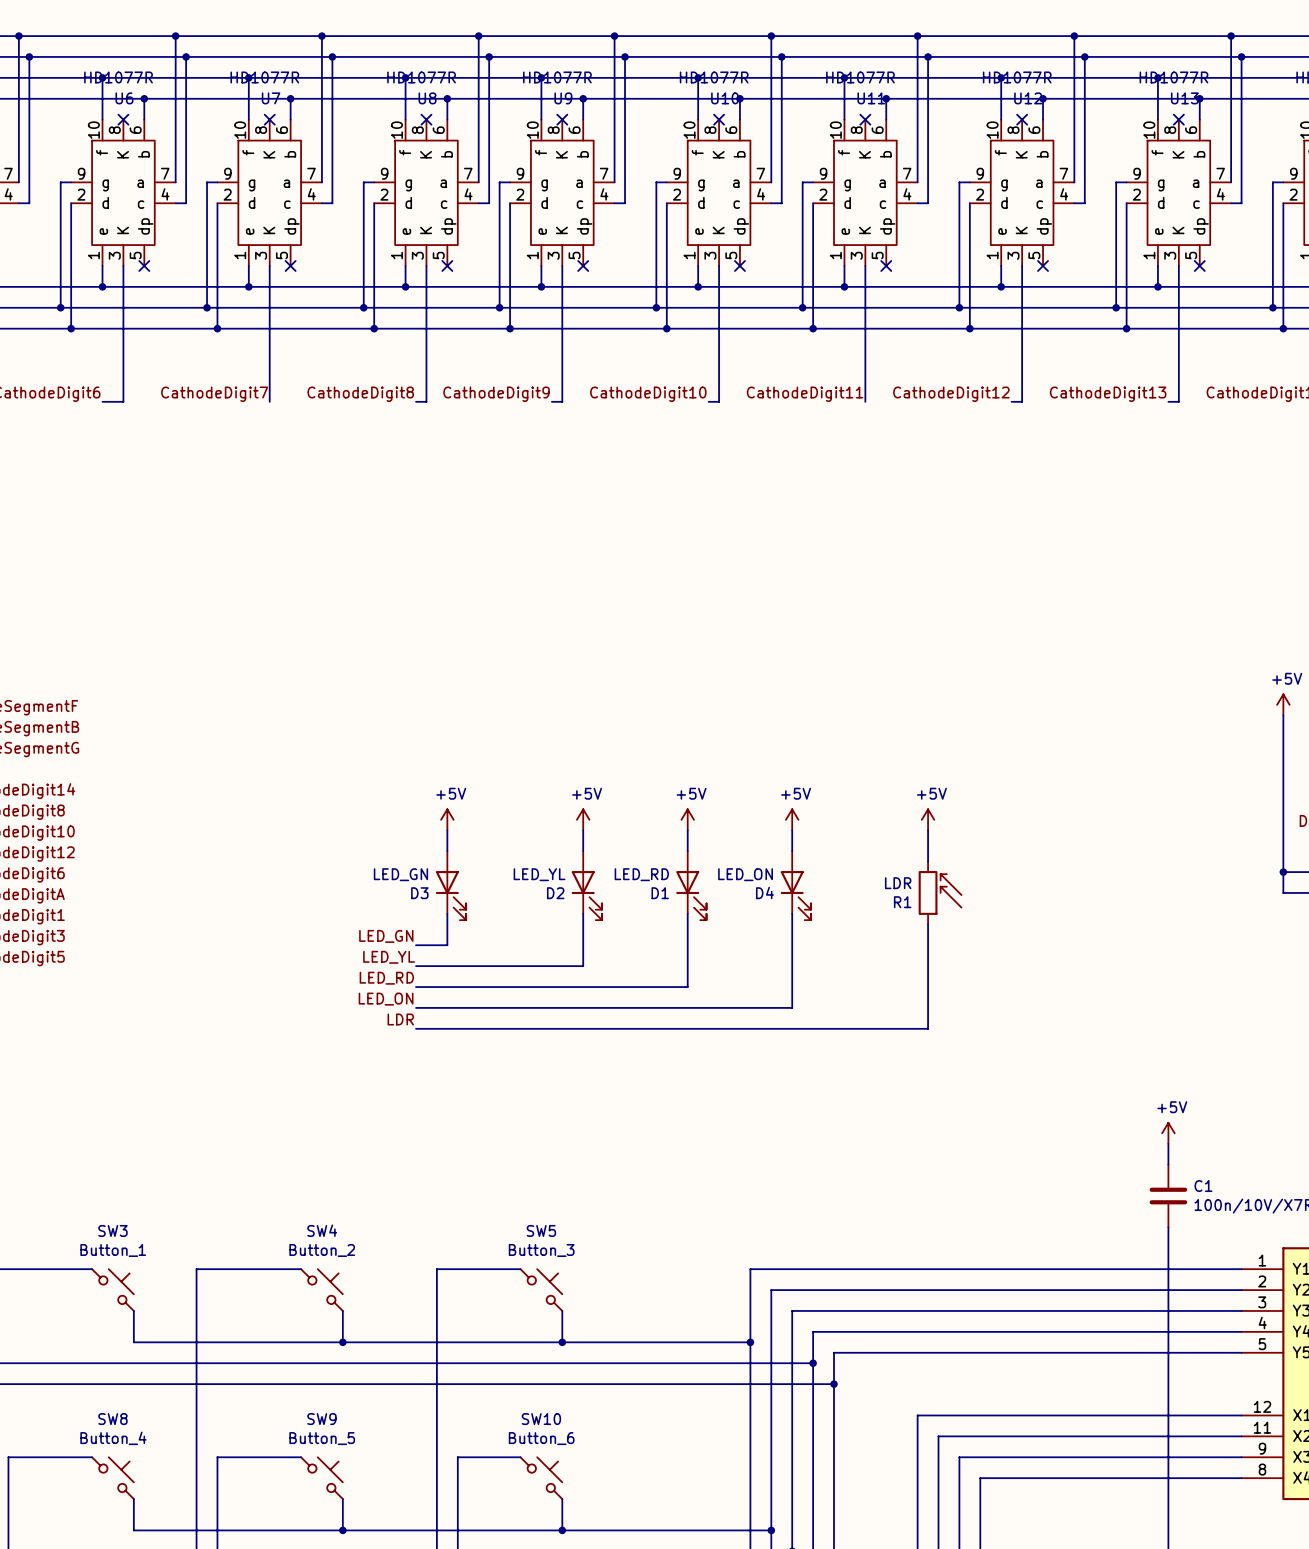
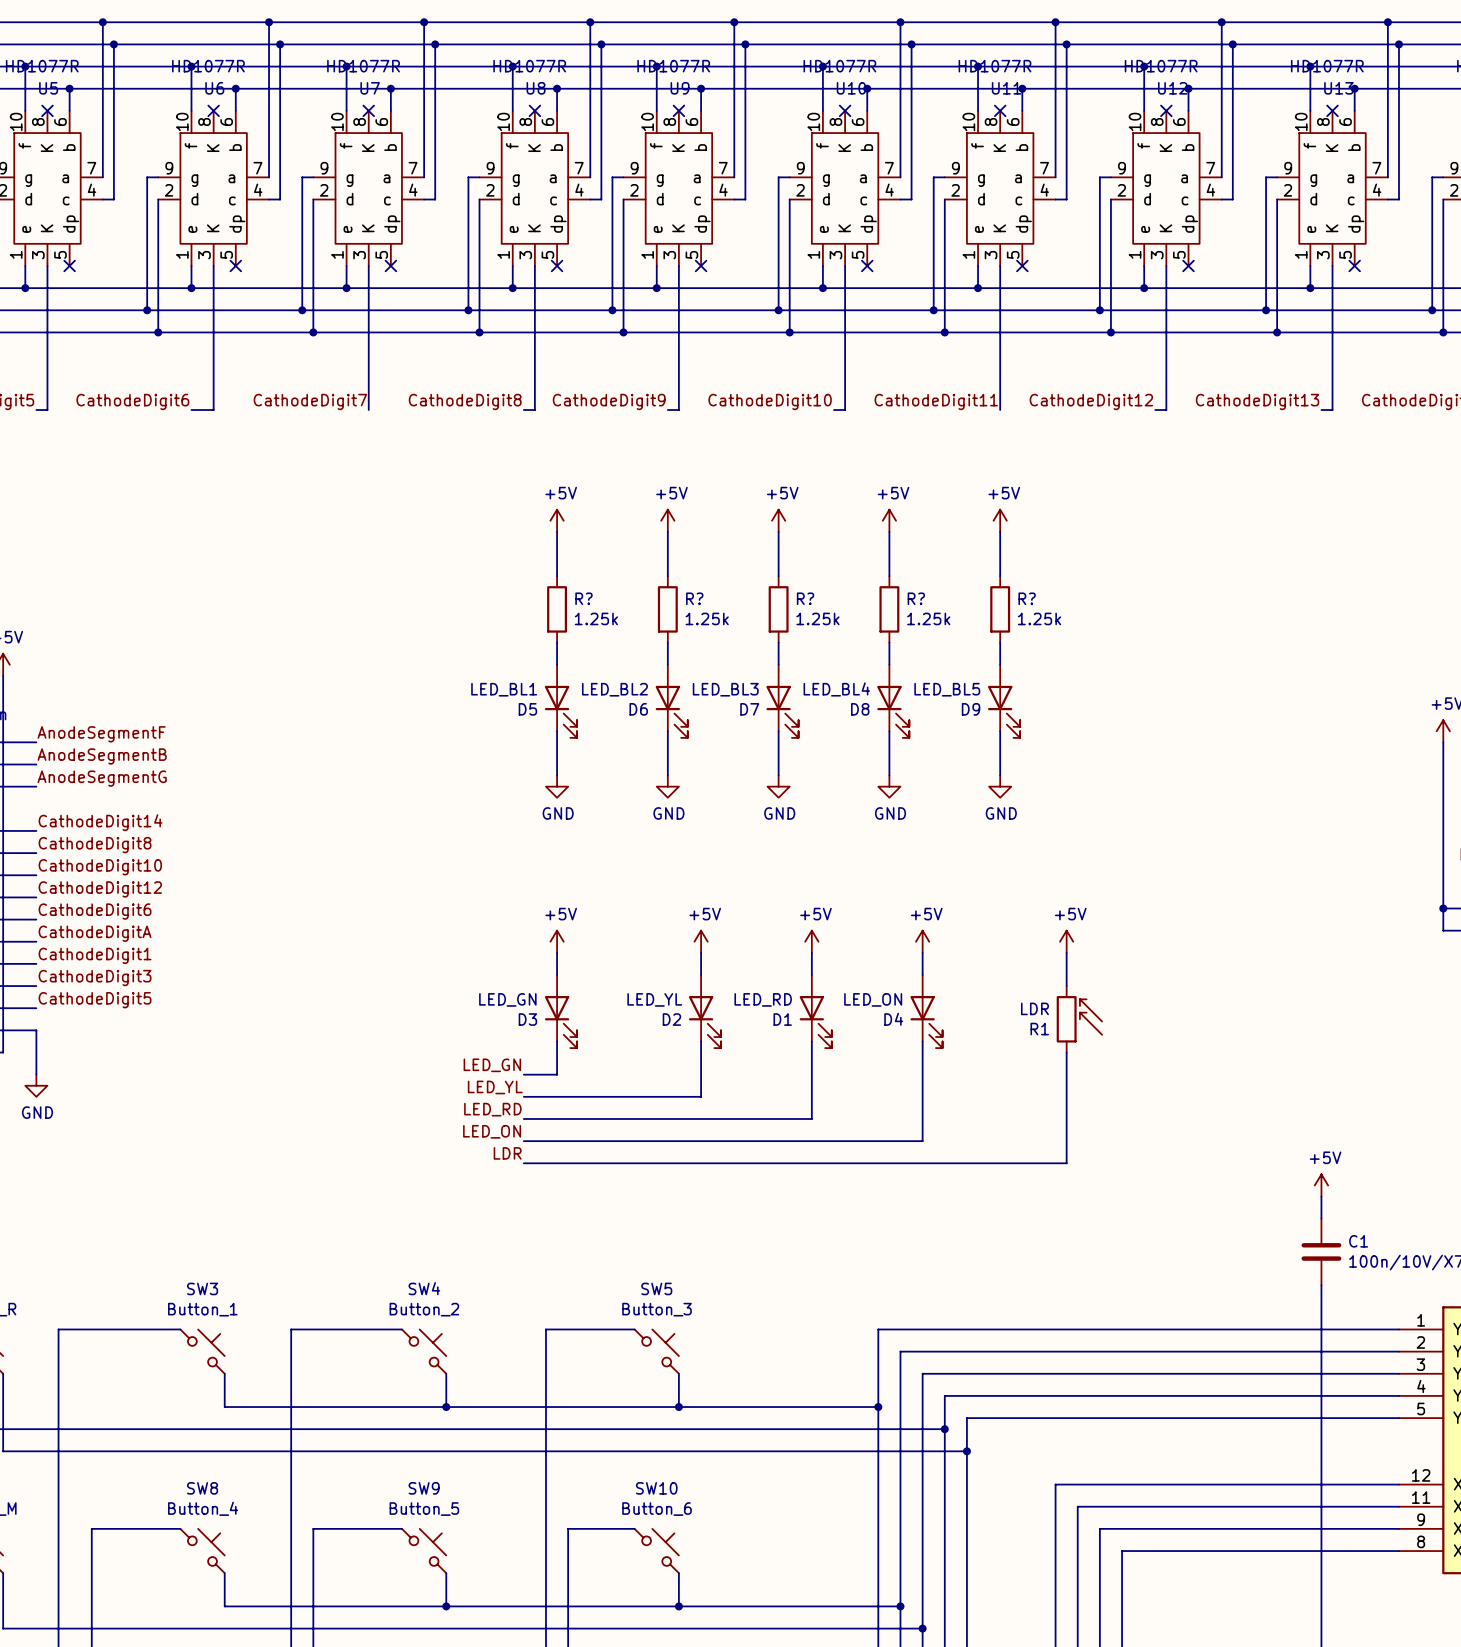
power symbol: none -> +5V (557, 520)
power symbol: none -> +5V (667, 520)
power symbol: none -> +5V (778, 520)
power symbol: none -> +5V (889, 520)
power symbol: none -> +5V (1000, 520)
wire: none -> (557, 531) (557, 576)
wire: none -> (667, 531) (667, 576)
wire: none -> (778, 531) (778, 576)
wire: none -> (889, 531) (889, 576)
wire: none -> (1000, 531) (1000, 576)
R?: none -> 1.25k (557, 609)
R?: none -> 1.25k (667, 609)
R?: none -> 1.25k (778, 609)
R?: none -> 1.25k (889, 609)
R?: none -> 1.25k (1000, 609)
wire: none -> (557, 642) (557, 664)
wire: none -> (667, 642) (667, 664)
wire: none -> (778, 642) (778, 664)
wire: none -> (889, 642) (889, 664)
wire: none -> (1000, 642) (1000, 664)
D5: none -> LED_BL1 (560, 701)
D6: none -> LED_BL2 (671, 701)
D7: none -> LED_BL3 (782, 701)
D8: none -> LED_BL4 (893, 701)
D9: none -> LED_BL5 (1004, 701)
wire: none -> (557, 731) (557, 775)
wire: none -> (667, 731) (667, 775)
wire: none -> (778, 731) (778, 775)
wire: none -> (889, 731) (889, 775)
wire: none -> (1000, 731) (1000, 775)
power symbol: none -> GND (557, 786)
power symbol: none -> GND (667, 786)
power symbol: none -> GND (778, 786)
power symbol: none -> GND (889, 786)
power symbol: none -> GND (1000, 786)
power symbol: +5V (447, 819) -> none
power symbol: +5V (583, 819) -> none
power symbol: +5V (687, 819) -> none
power symbol: +5V (792, 819) -> none
power symbol: +5V (928, 819) -> none
wire: (447, 830) (447, 851) -> none
wire: (583, 830) (583, 851) -> none
wire: (687, 830) (687, 851) -> none
wire: (792, 830) (792, 851) -> none
wire: (928, 830) (928, 861) -> none
D3 position: (451, 885) -> (560, 1011)
D2 position: (586, 885) -> (704, 1011)
D1 position: (691, 885) -> (815, 1011)
D4 position: (795, 885) -> (926, 1011)
R1 position: (940, 892) -> (1079, 1019)
power symbol: none -> +5V (557, 941)
power symbol: none -> +5V (701, 941)
power symbol: none -> +5V (811, 941)
power symbol: none -> +5V (922, 941)
power symbol: none -> +5V (1066, 941)
wire: (447, 934) (447, 945) (416, 945) -> none
wire: (583, 934) (583, 966) (416, 966) -> none
wire: (687, 934) (687, 987) (416, 987) -> none
label: LED_GN (386, 936) -> none
wire: (928, 945) (928, 1007) -> none
label position: LED_YL (389, 957) -> LED_YL (495, 1087)
label position: LED_RD (386, 978) -> LED_RD (492, 1109)
wire: none -> (557, 1041) (557, 1074)
wire: none -> (701, 1041) (701, 1096) (523, 1096)
wire: none -> (811, 1041) (811, 1118) (523, 1118)
label position: LED_ON (386, 999) -> LED_ON (492, 1131)
wire: (416, 1007) (792, 1007) -> (523, 1141) (922, 1141) (922, 1052)
label: LDR (400, 1019) -> LED_GN (492, 1065)
wire: (447, 1028) (928, 1028) -> (523, 1163) (1066, 1163) (1066, 1074)
label: none -> LDR (507, 1153)

